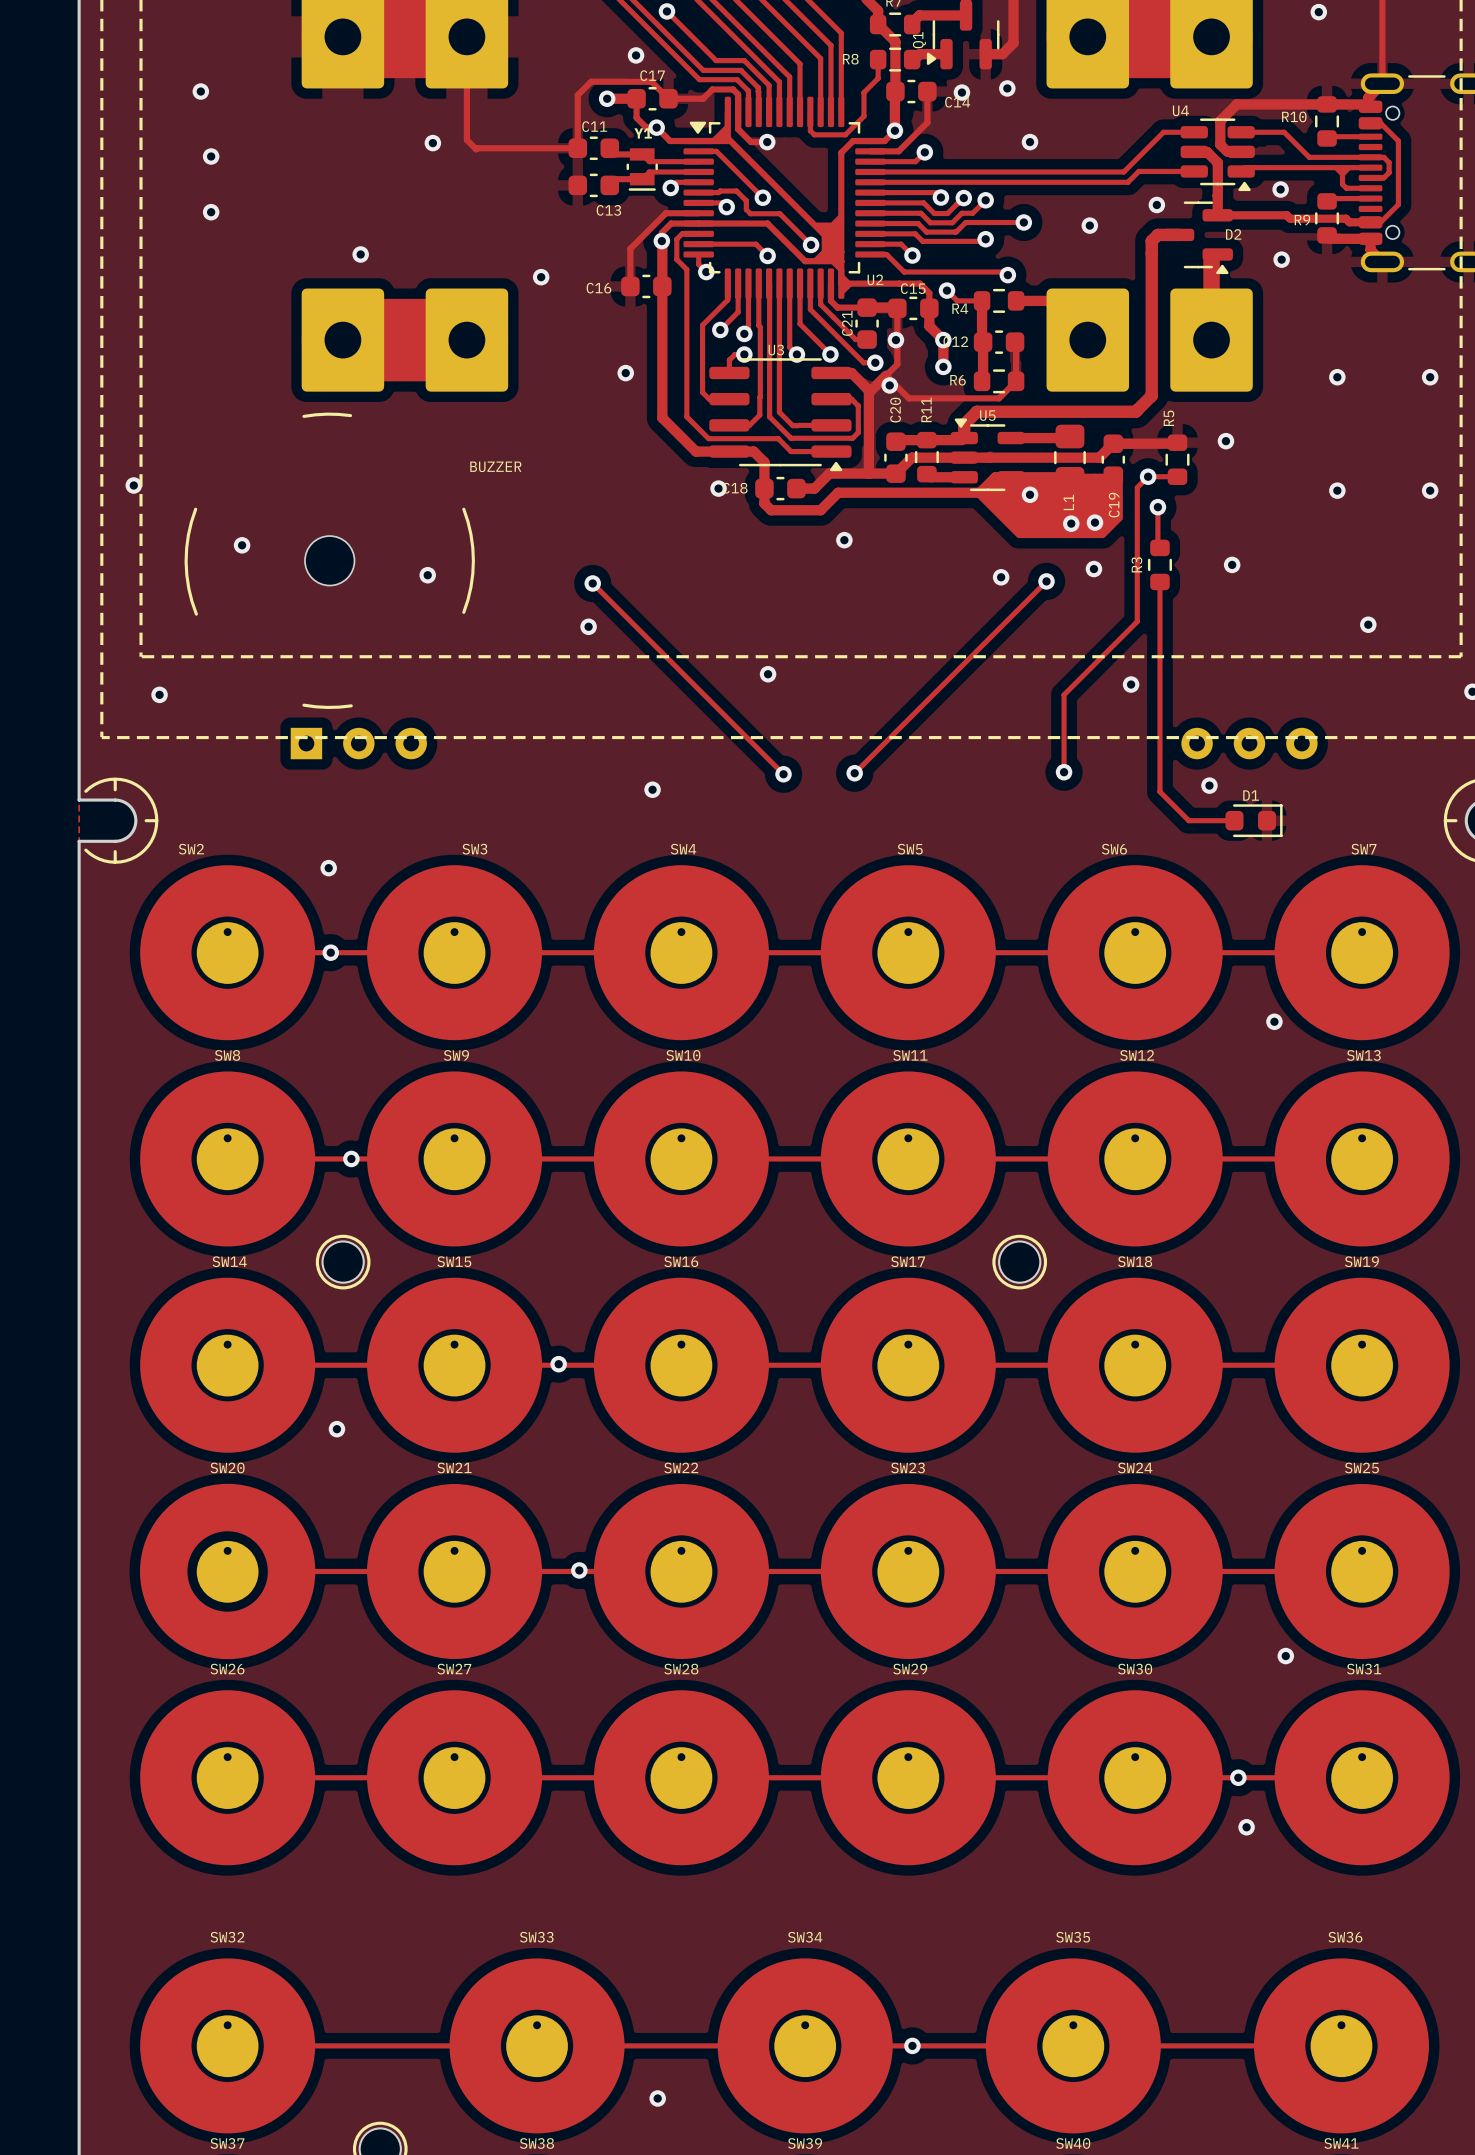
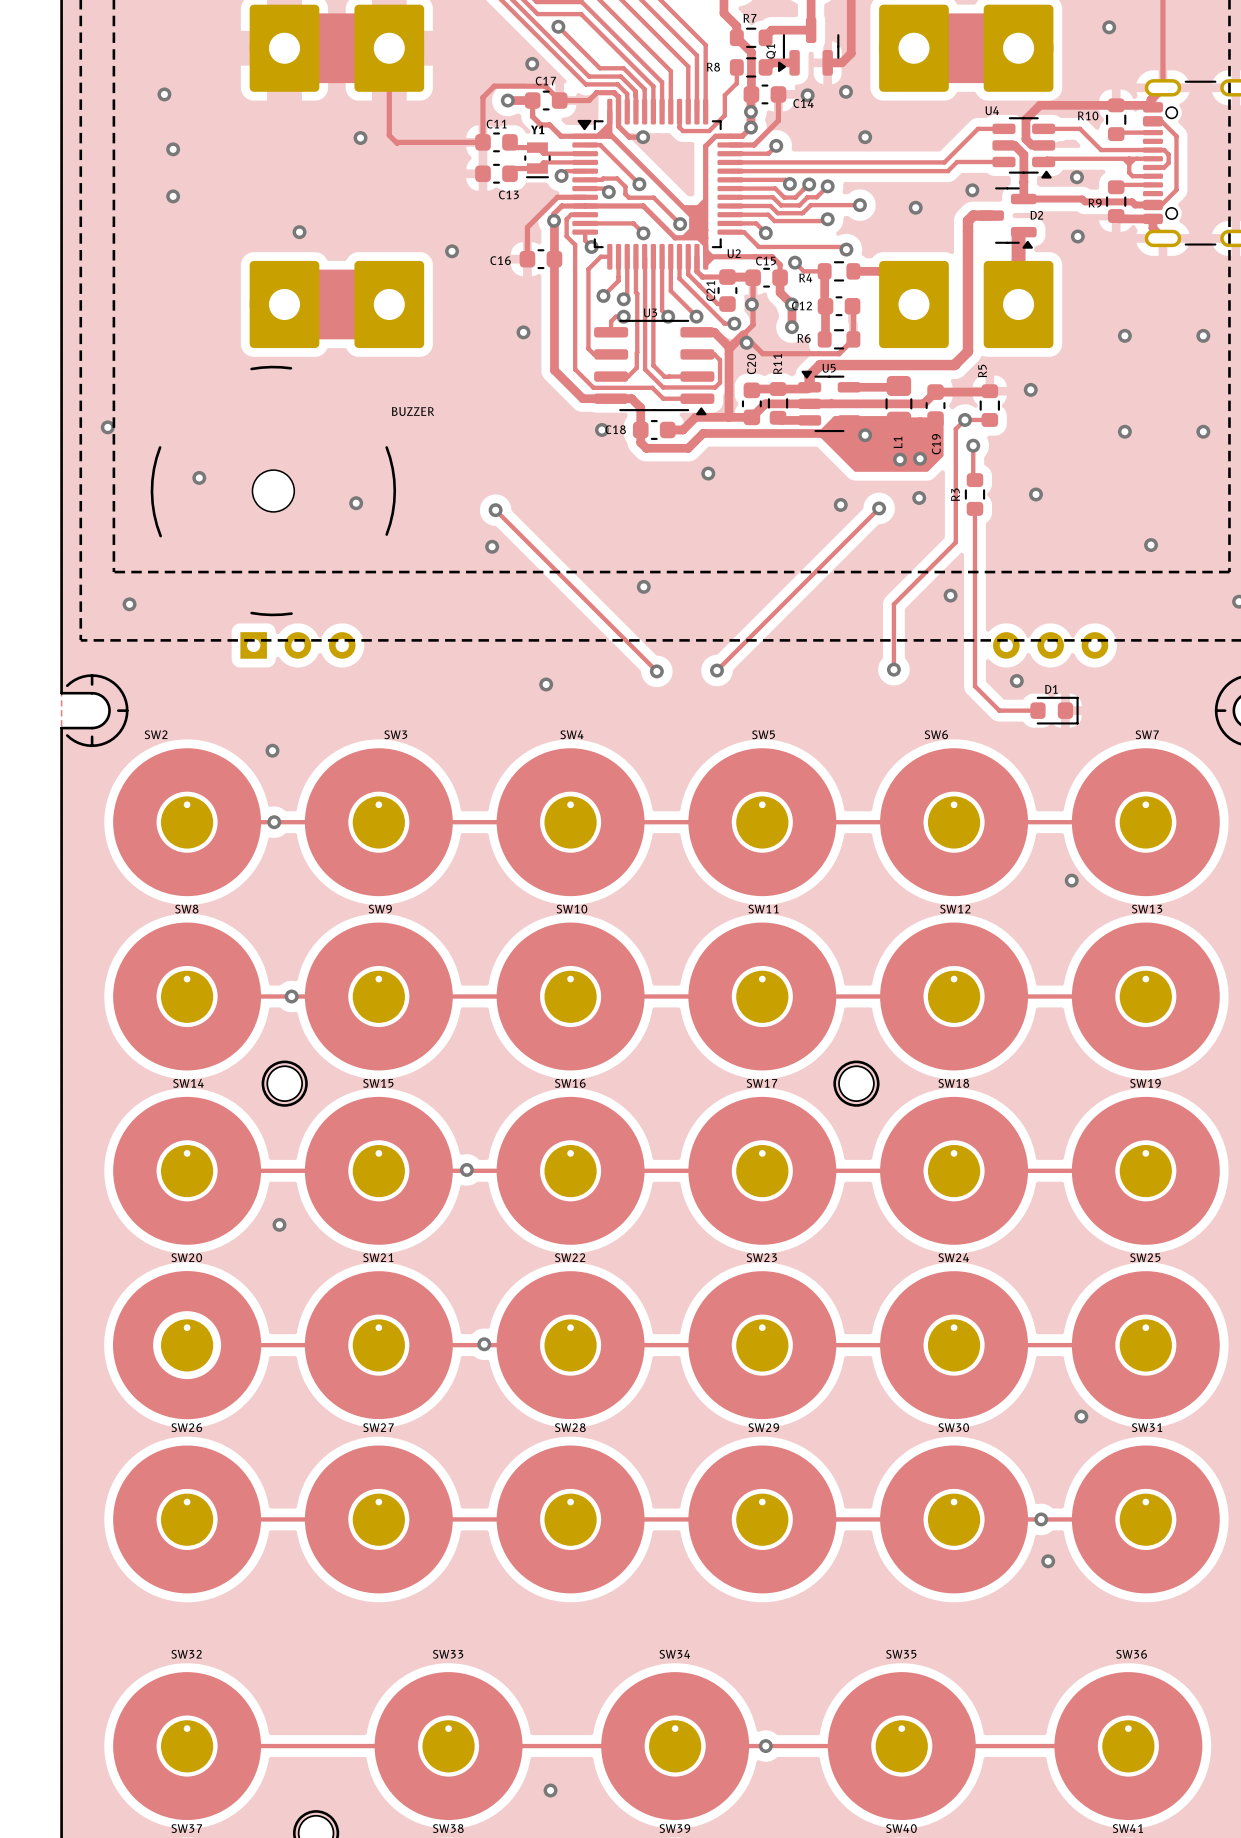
via: none -> (750, 111)
via: (656, 127) -> none
track: (727, 283) (727, 299) (702, 325) -> (609, 256) (600, 256) (588, 269) (588, 291)

